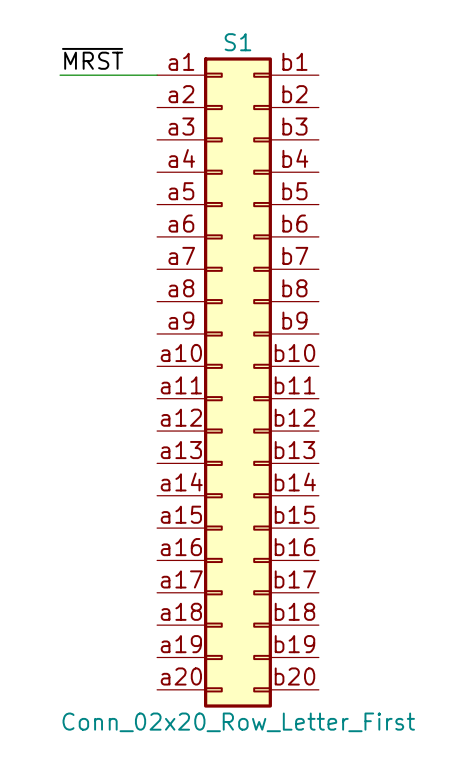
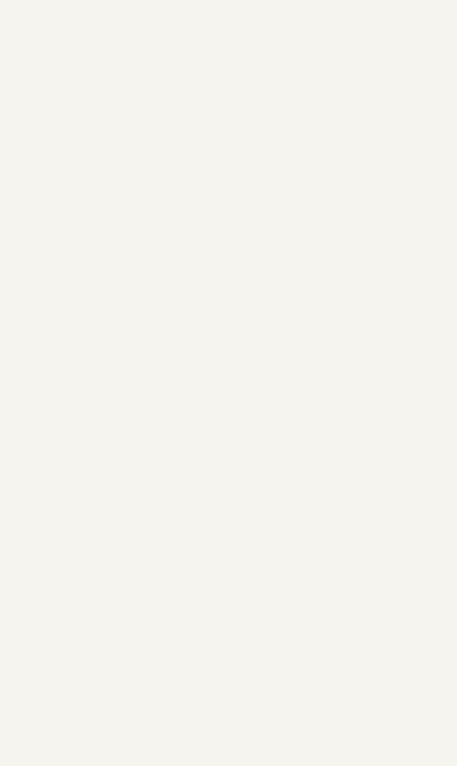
label: ~{MRST} (92, 58) -> none
wire: (60, 75) (157, 75) -> none
S1: Conn_02x20_Row_Letter_First (237, 382) -> none

